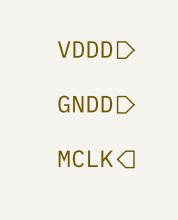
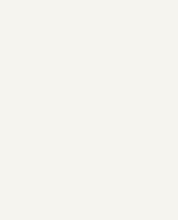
hierarchical label: VDDD (85, 49) -> none
hierarchical label: GNDD (85, 104) -> none
hierarchical label: MCLK (85, 158) -> none

